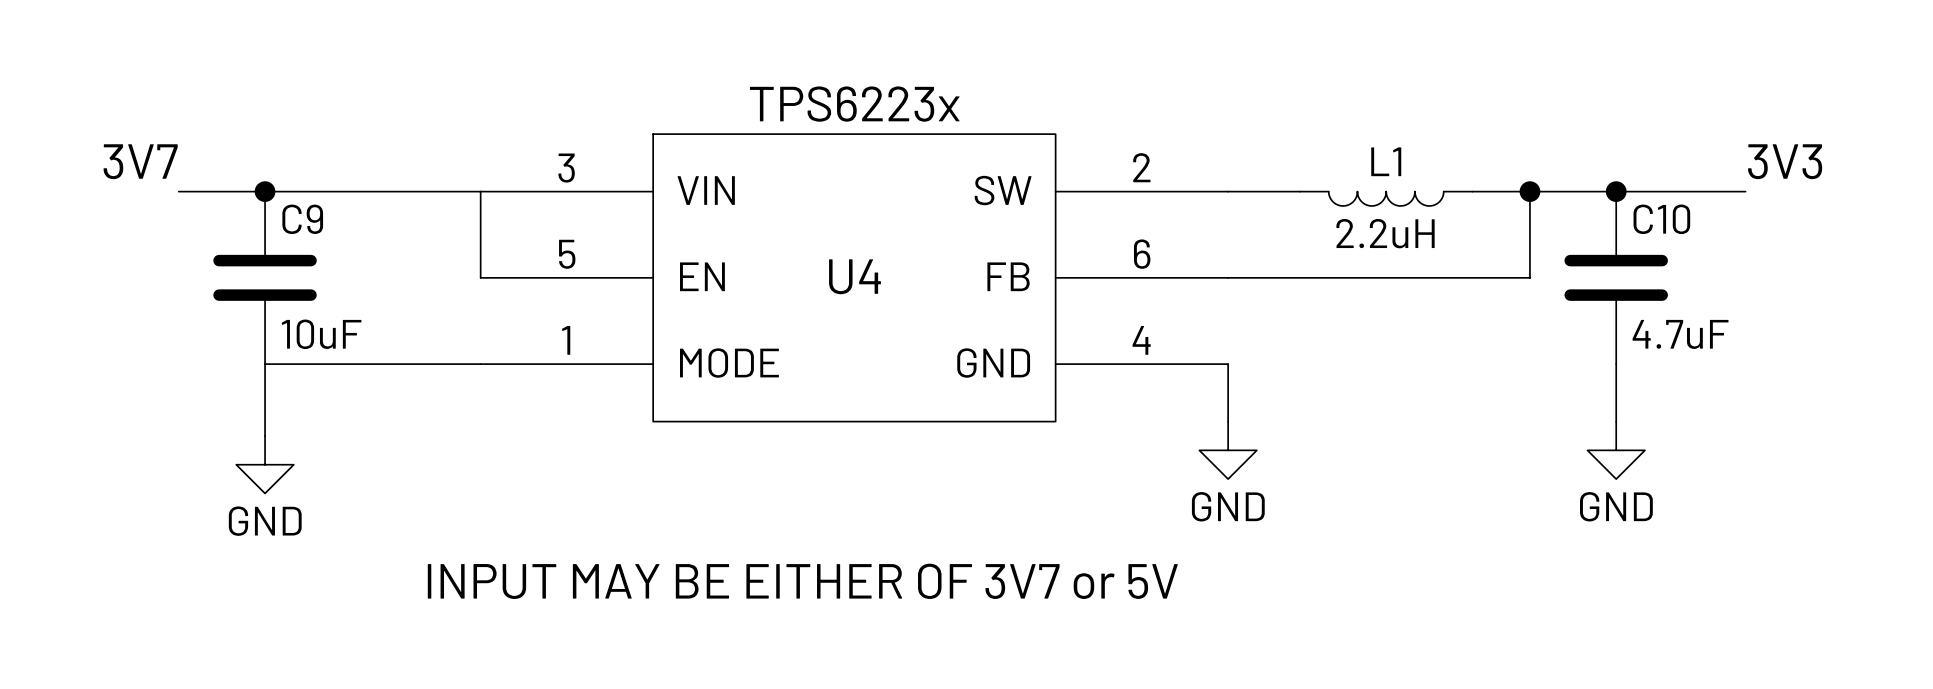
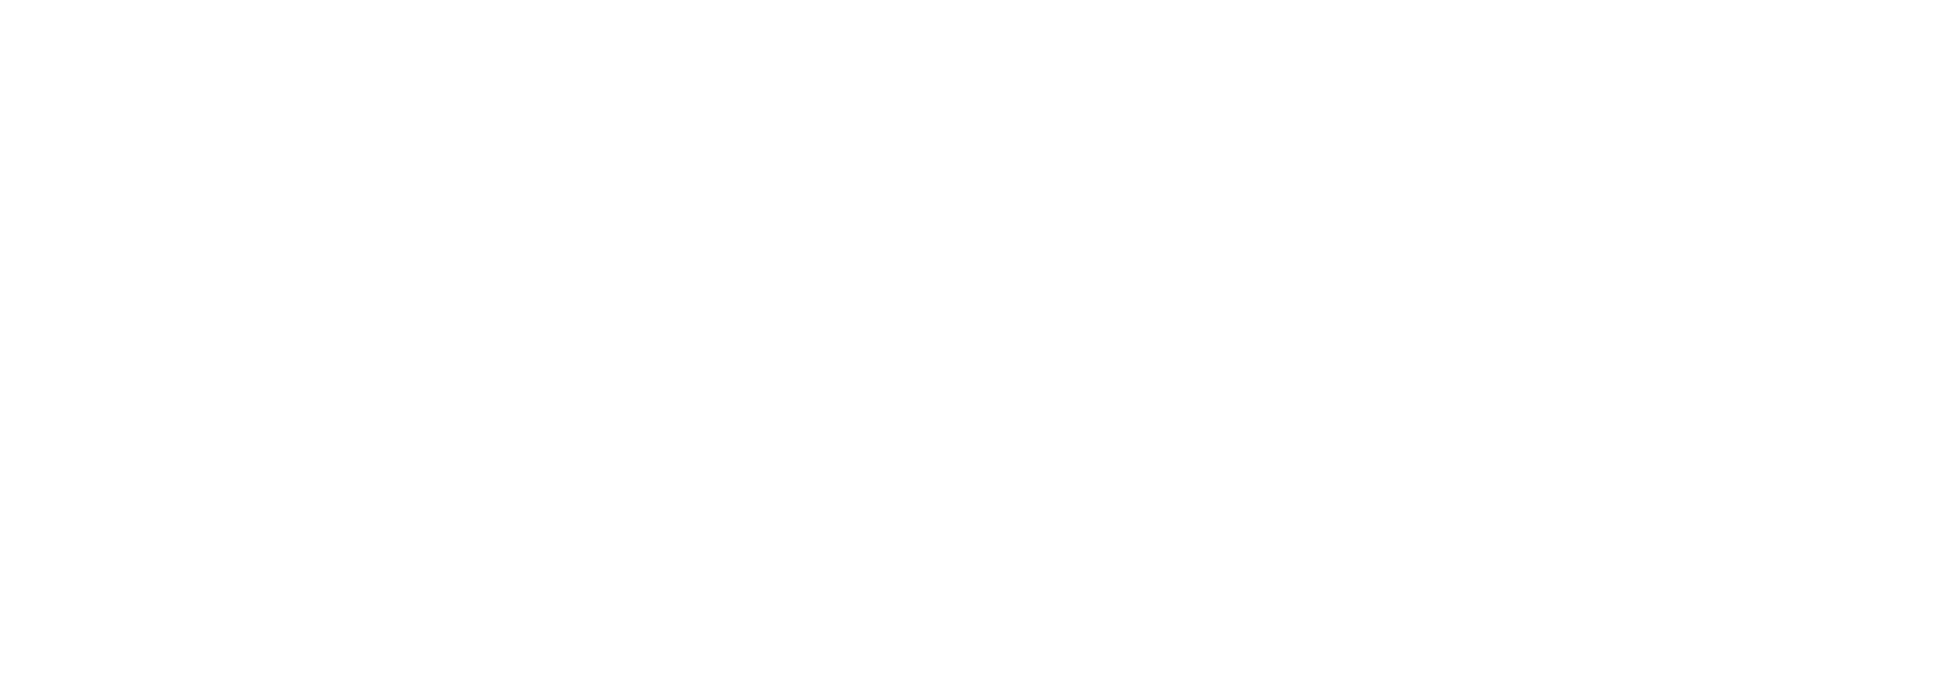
label: 3V7 (140, 161) -> none
label: 3V3 (1785, 161) -> none
wire: (178, 191) (480, 191) (480, 277) -> none
junction: (265, 191) -> none
wire: (1228, 191) (1299, 191) -> none
wire: (1472, 191) (1745, 191) -> none
wire: (1529, 191) (1529, 277) (1228, 277) -> none
junction: (1529, 191) -> none
junction: (1616, 191) -> none
L1: 2.2uH (1386, 198) -> none
C9: 10uF (265, 277) -> none
U4: TPS6223x (854, 277) -> none
C10: 4.7uF (1616, 277) -> none
wire: (480, 364) (265, 364) (265, 435) -> none
wire: (1228, 364) (1228, 421) -> none
wire: (1616, 364) (1616, 421) -> none
power symbol: GND (1228, 450) -> none
power symbol: GND (1616, 450) -> none
power symbol: GND (265, 464) -> none
text: INPUT MAY BE EITHER OF 3V7 or 5V (802, 581) -> none

